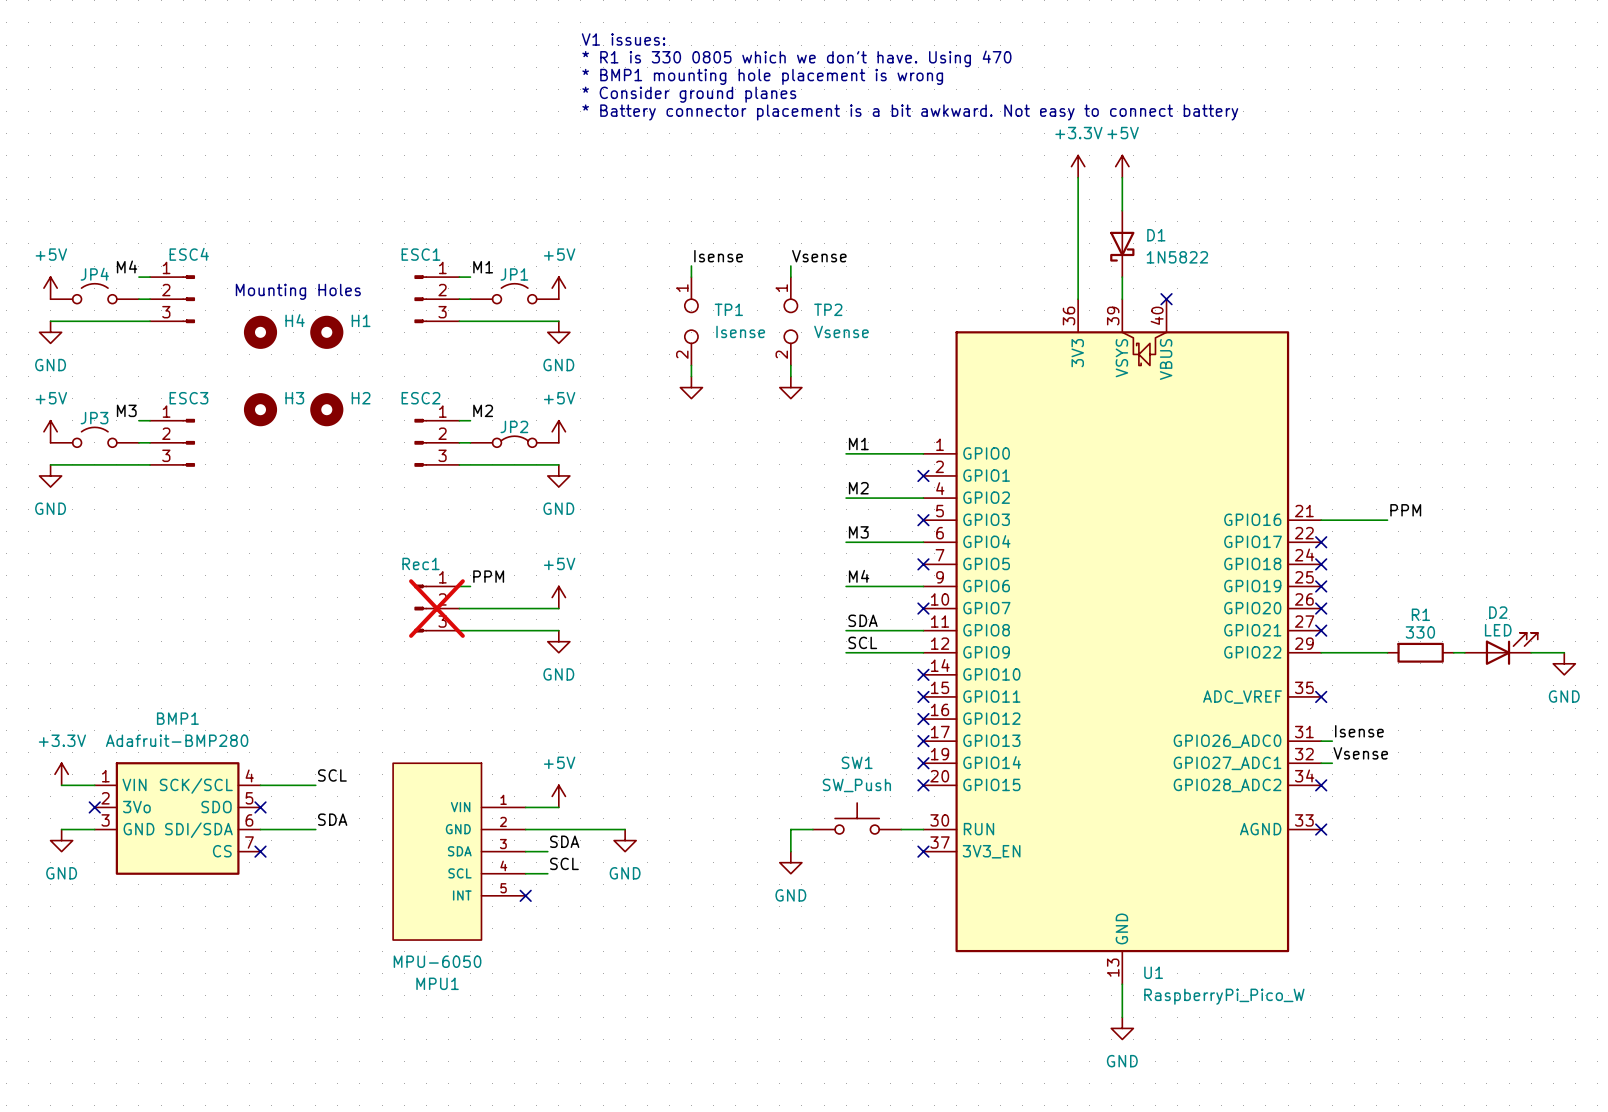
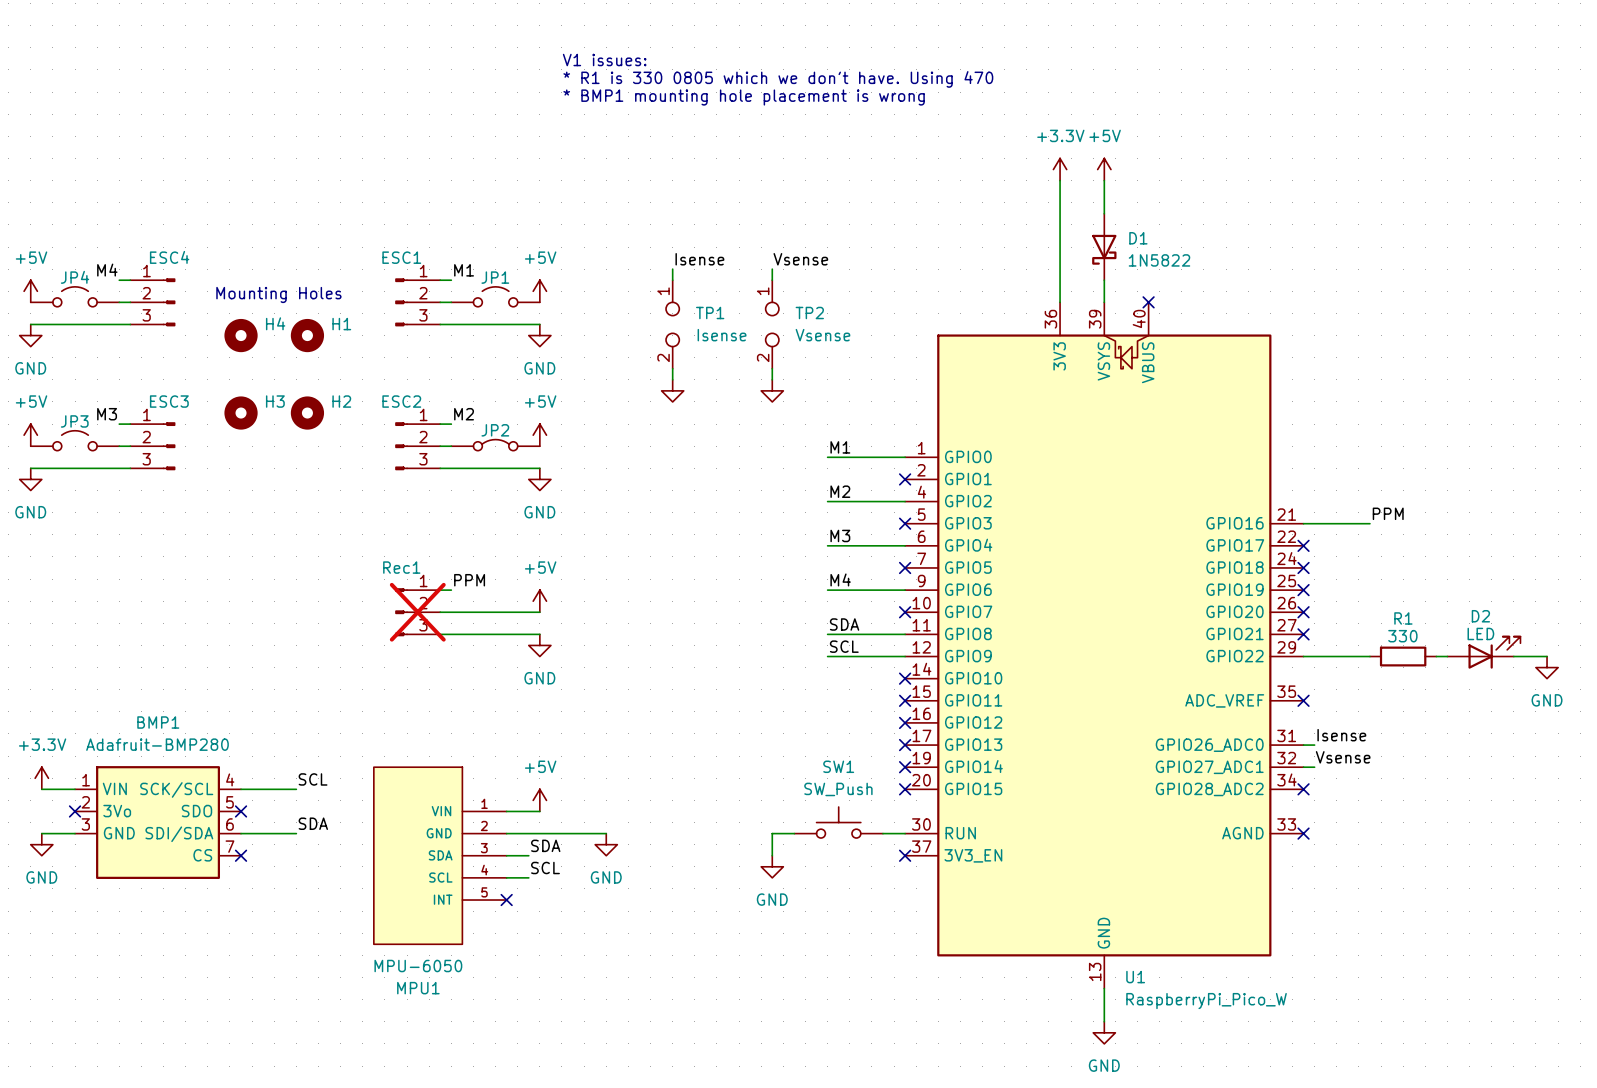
text: V1 issues: (623, 39) -> none
text: * R1 is 330 0805 which we don't have. Using 470 (796, 58) -> V1 issues: (604, 60)
text: * BMP1 mounting hole placement is wrong (762, 76) -> * R1 is 330 0805 which we don't have. Using 470 (778, 79)
text: * Consider ground planes (689, 94) -> * BMP1 mounting hole placement is wrong (744, 97)
text: * Battery connector placement is a bit awkward. Not easy to connect battery (910, 112) -> none

